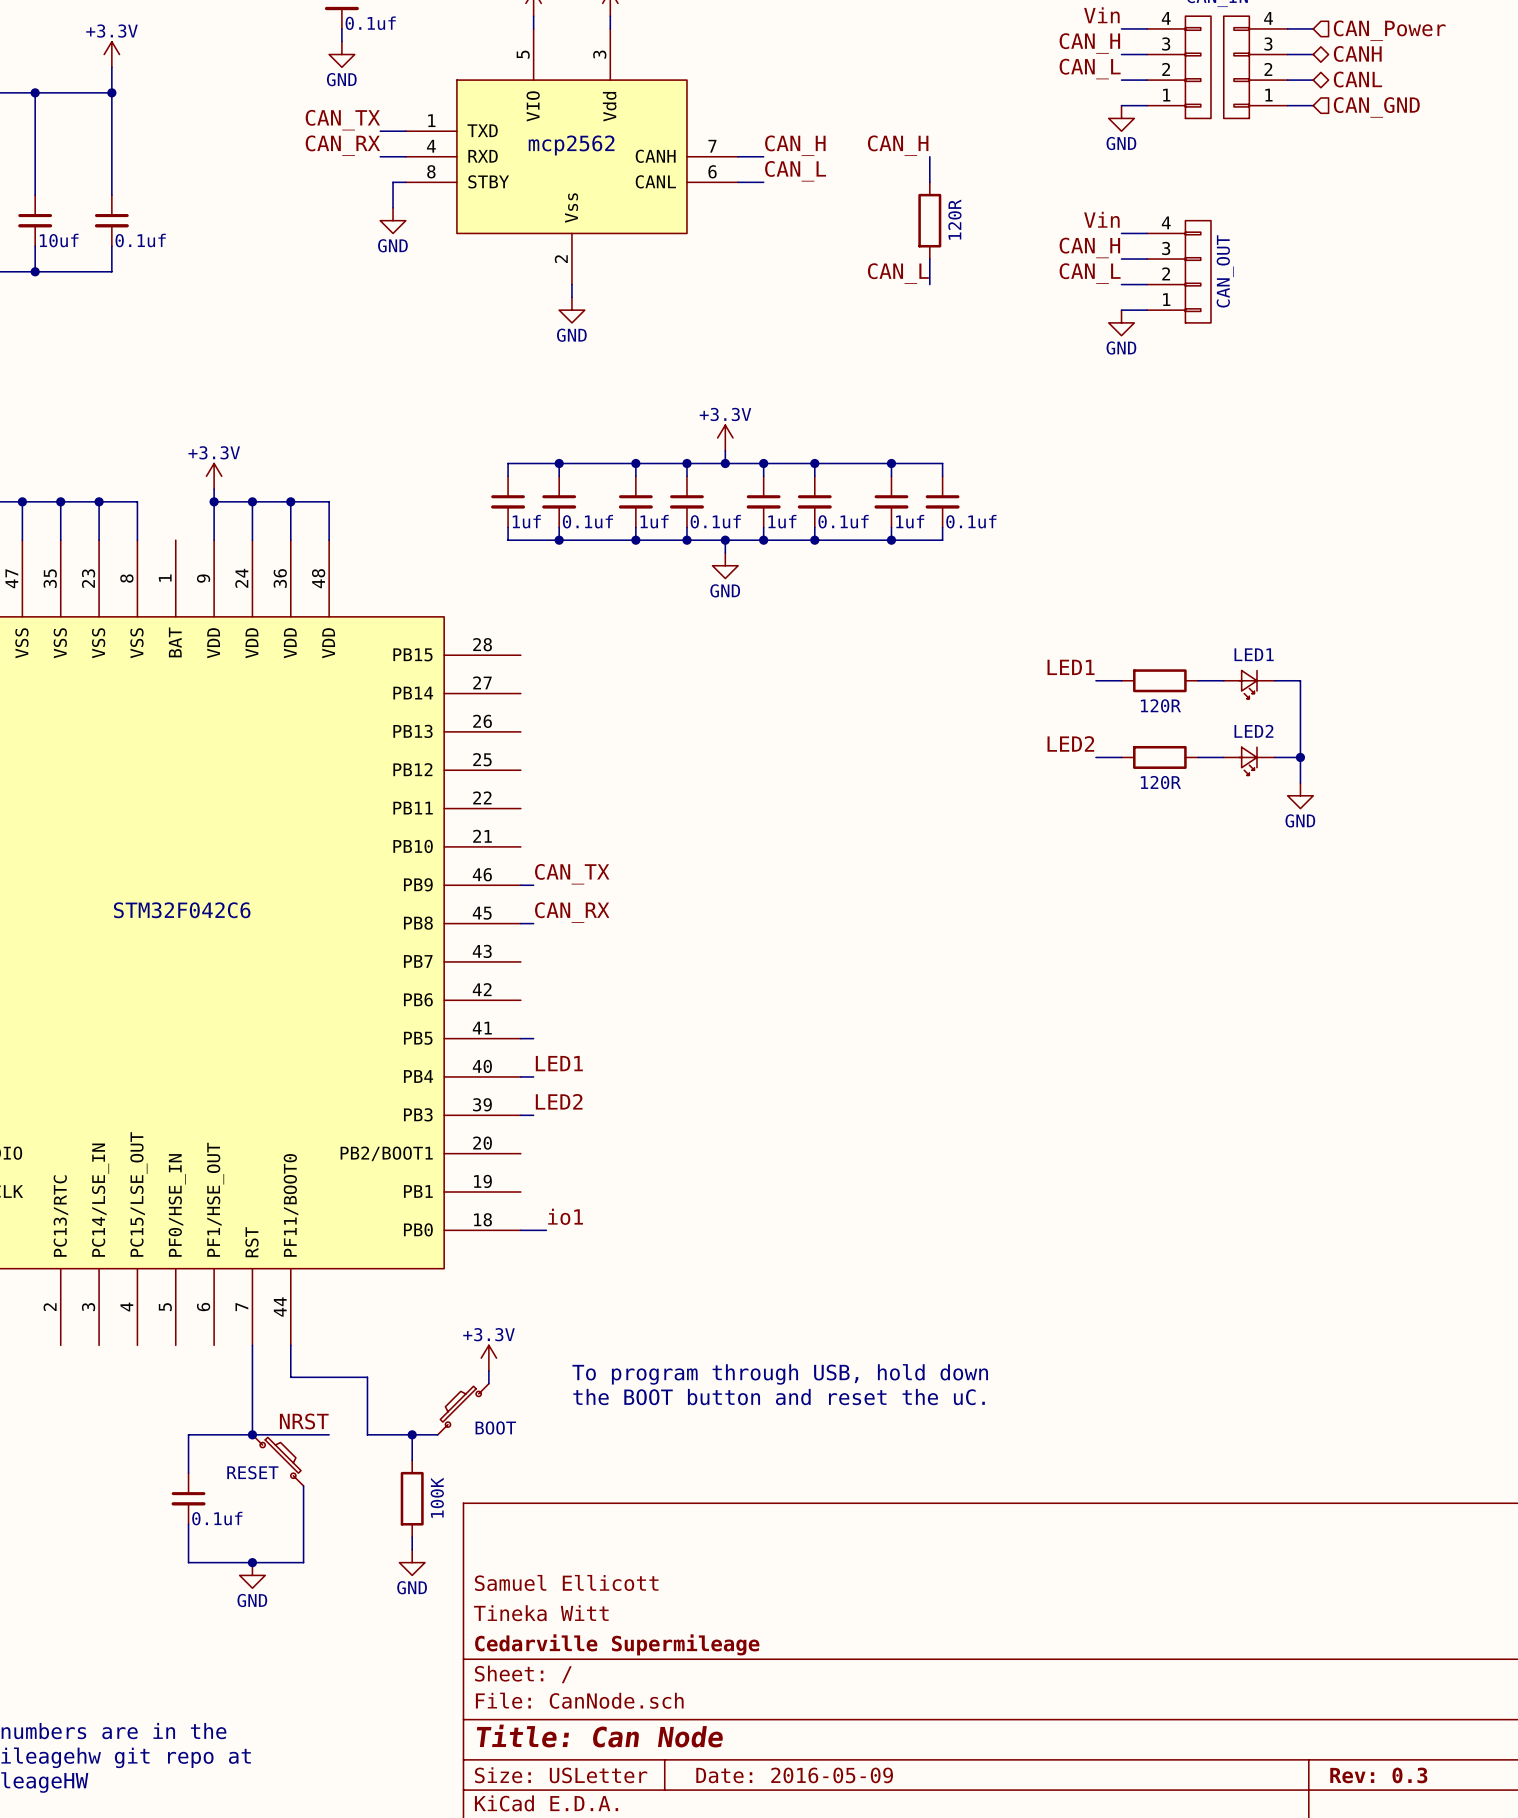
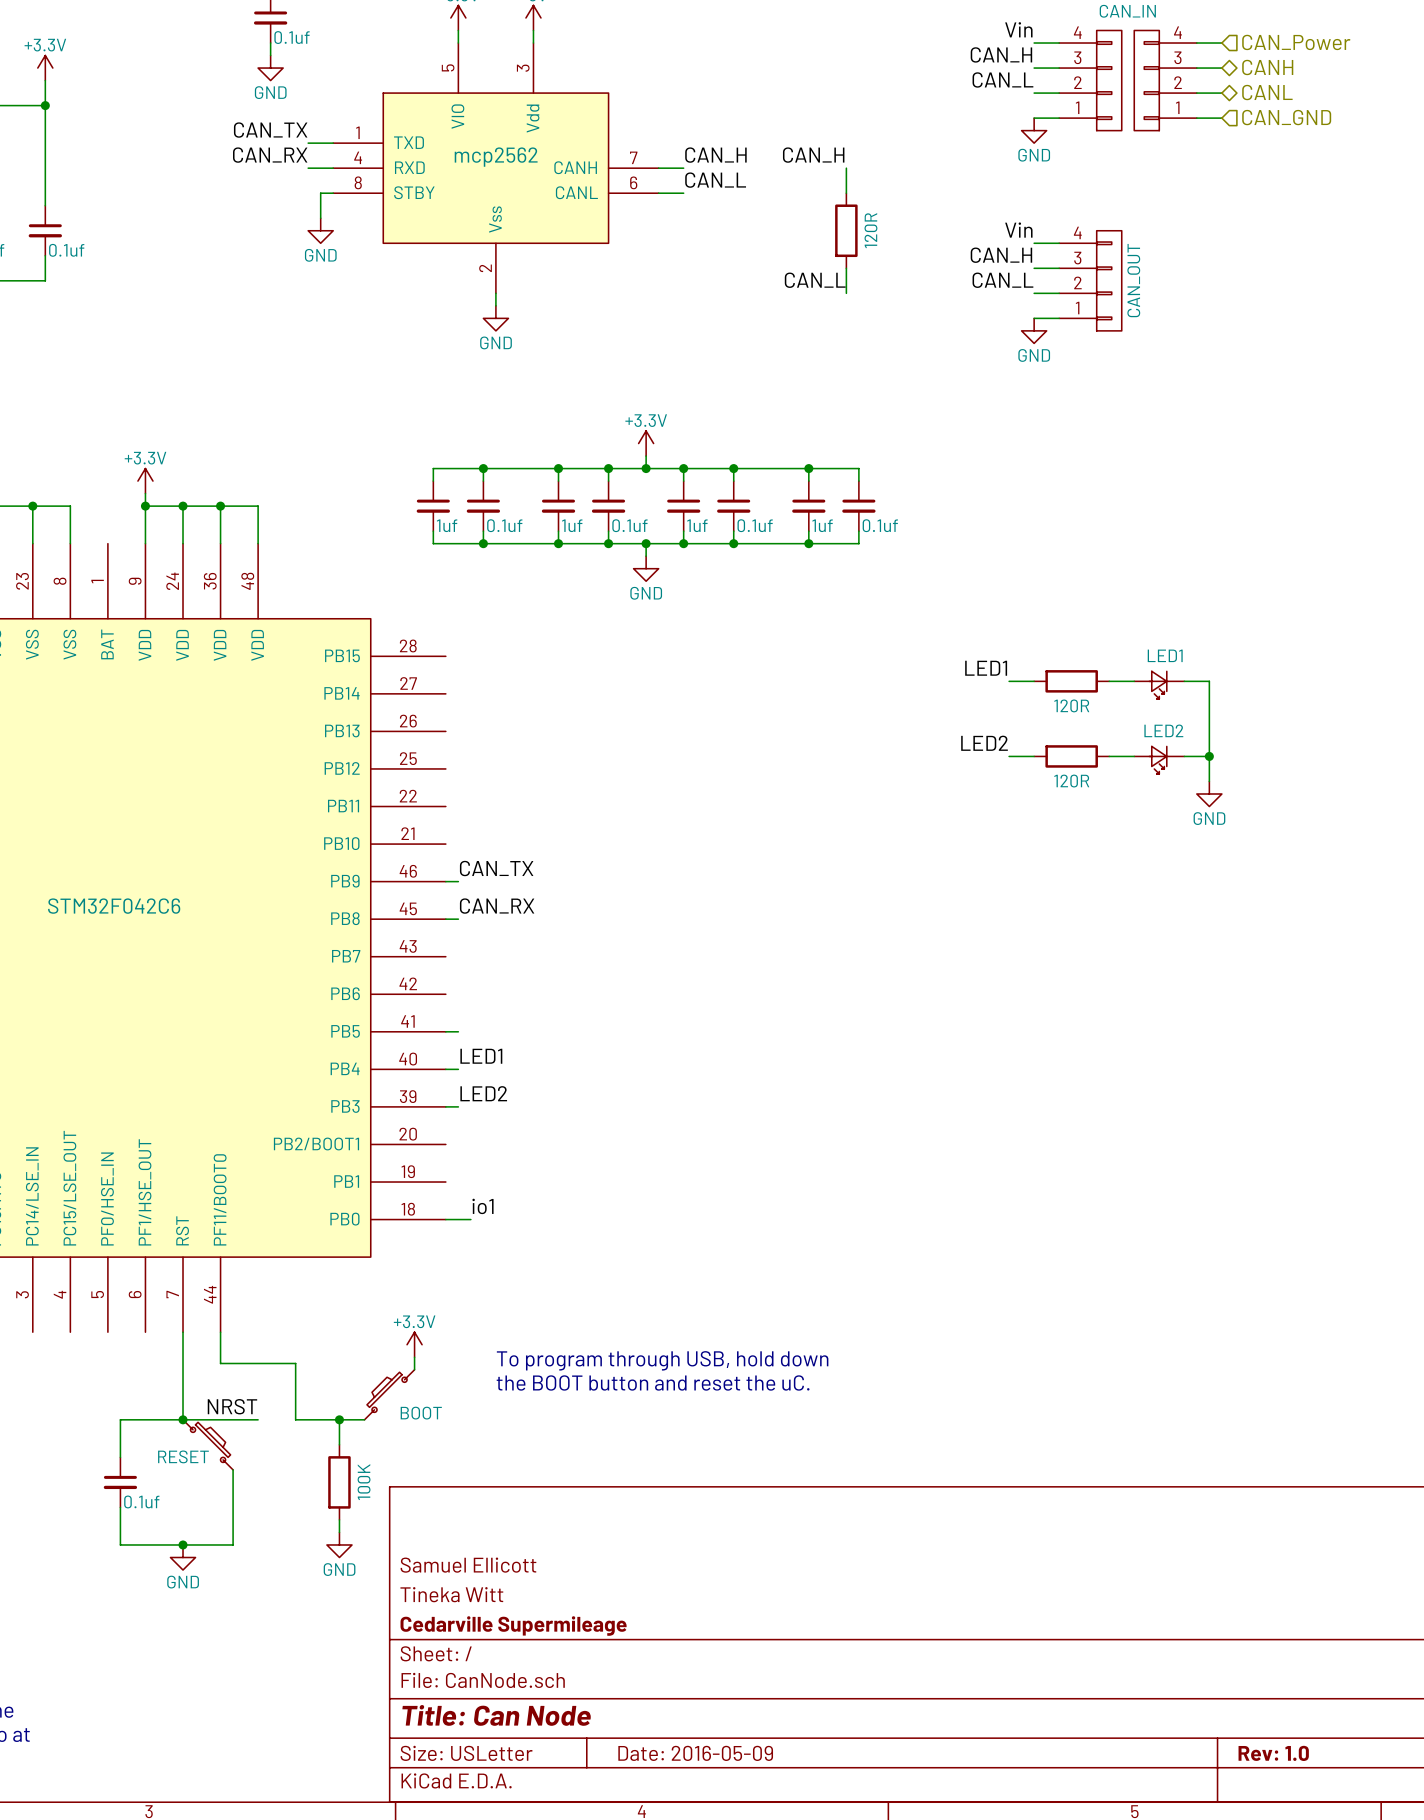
title block: Rev: 0.3 (1378, 1775) -> Rev: 1.0 (1273, 1753)

